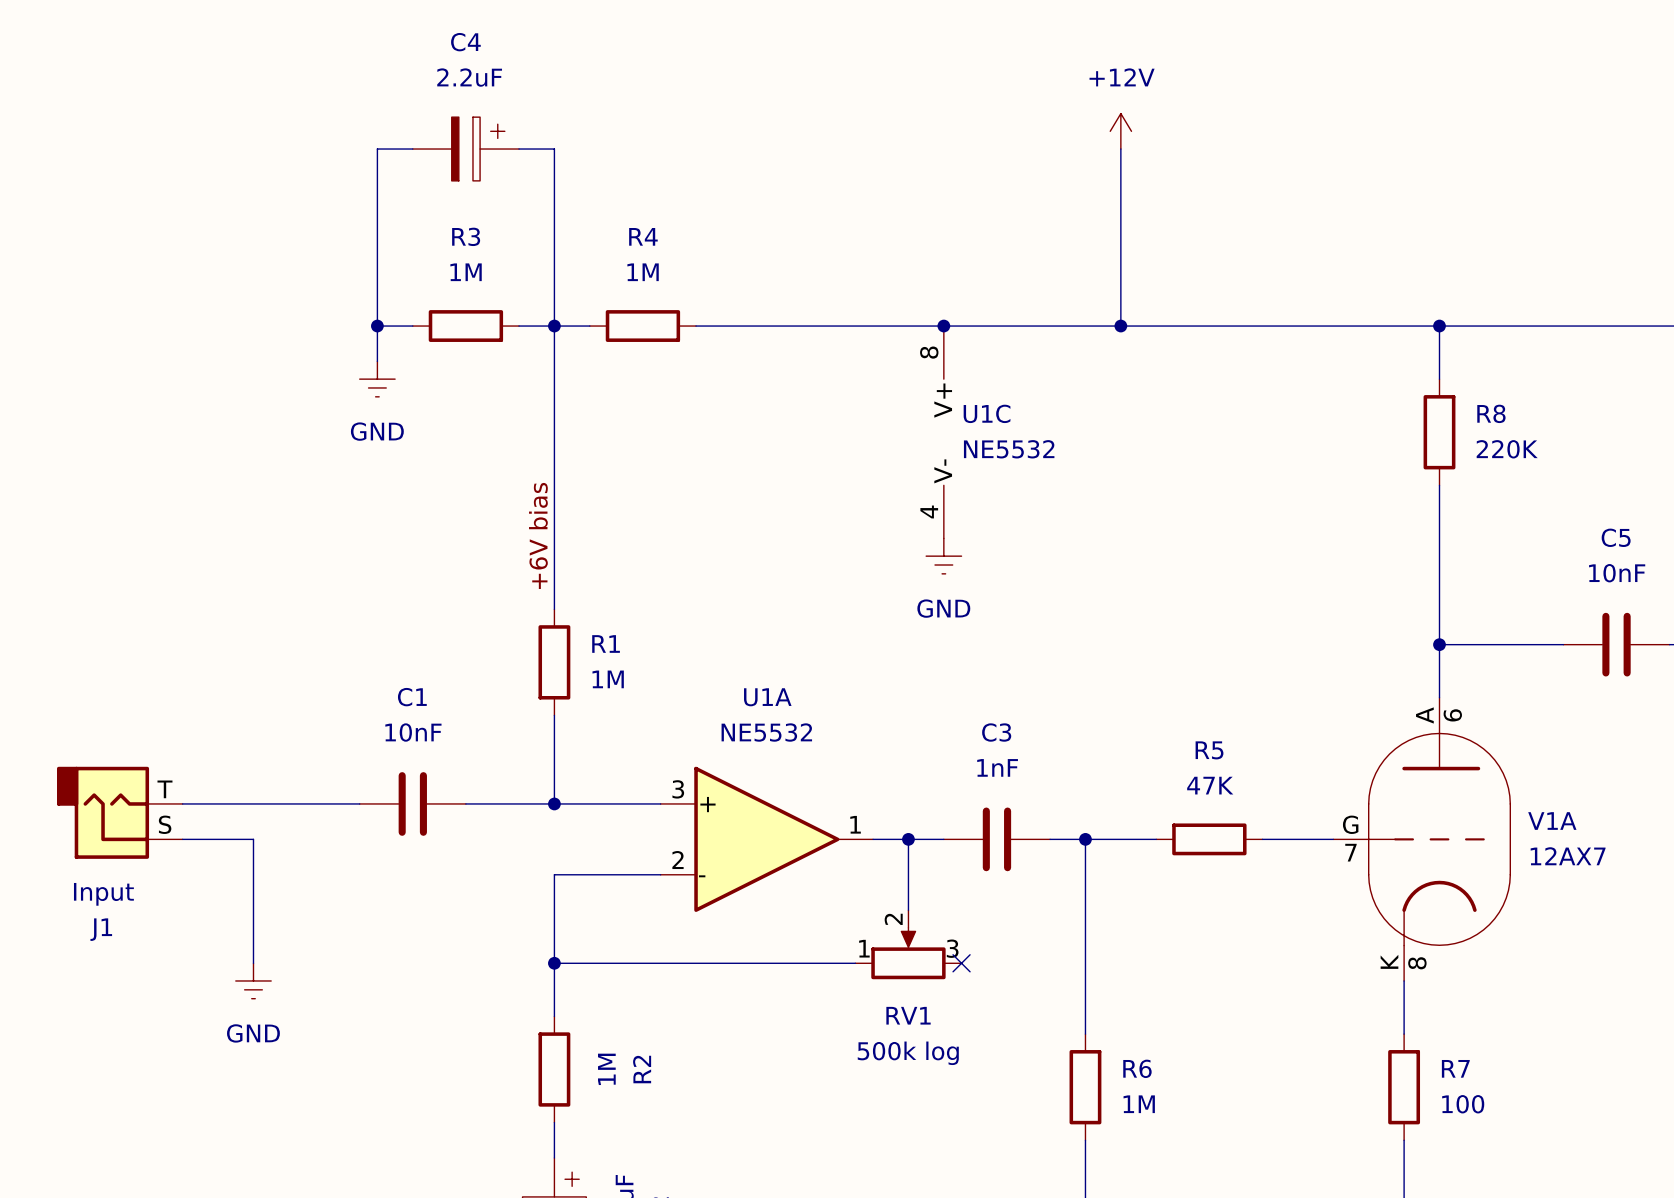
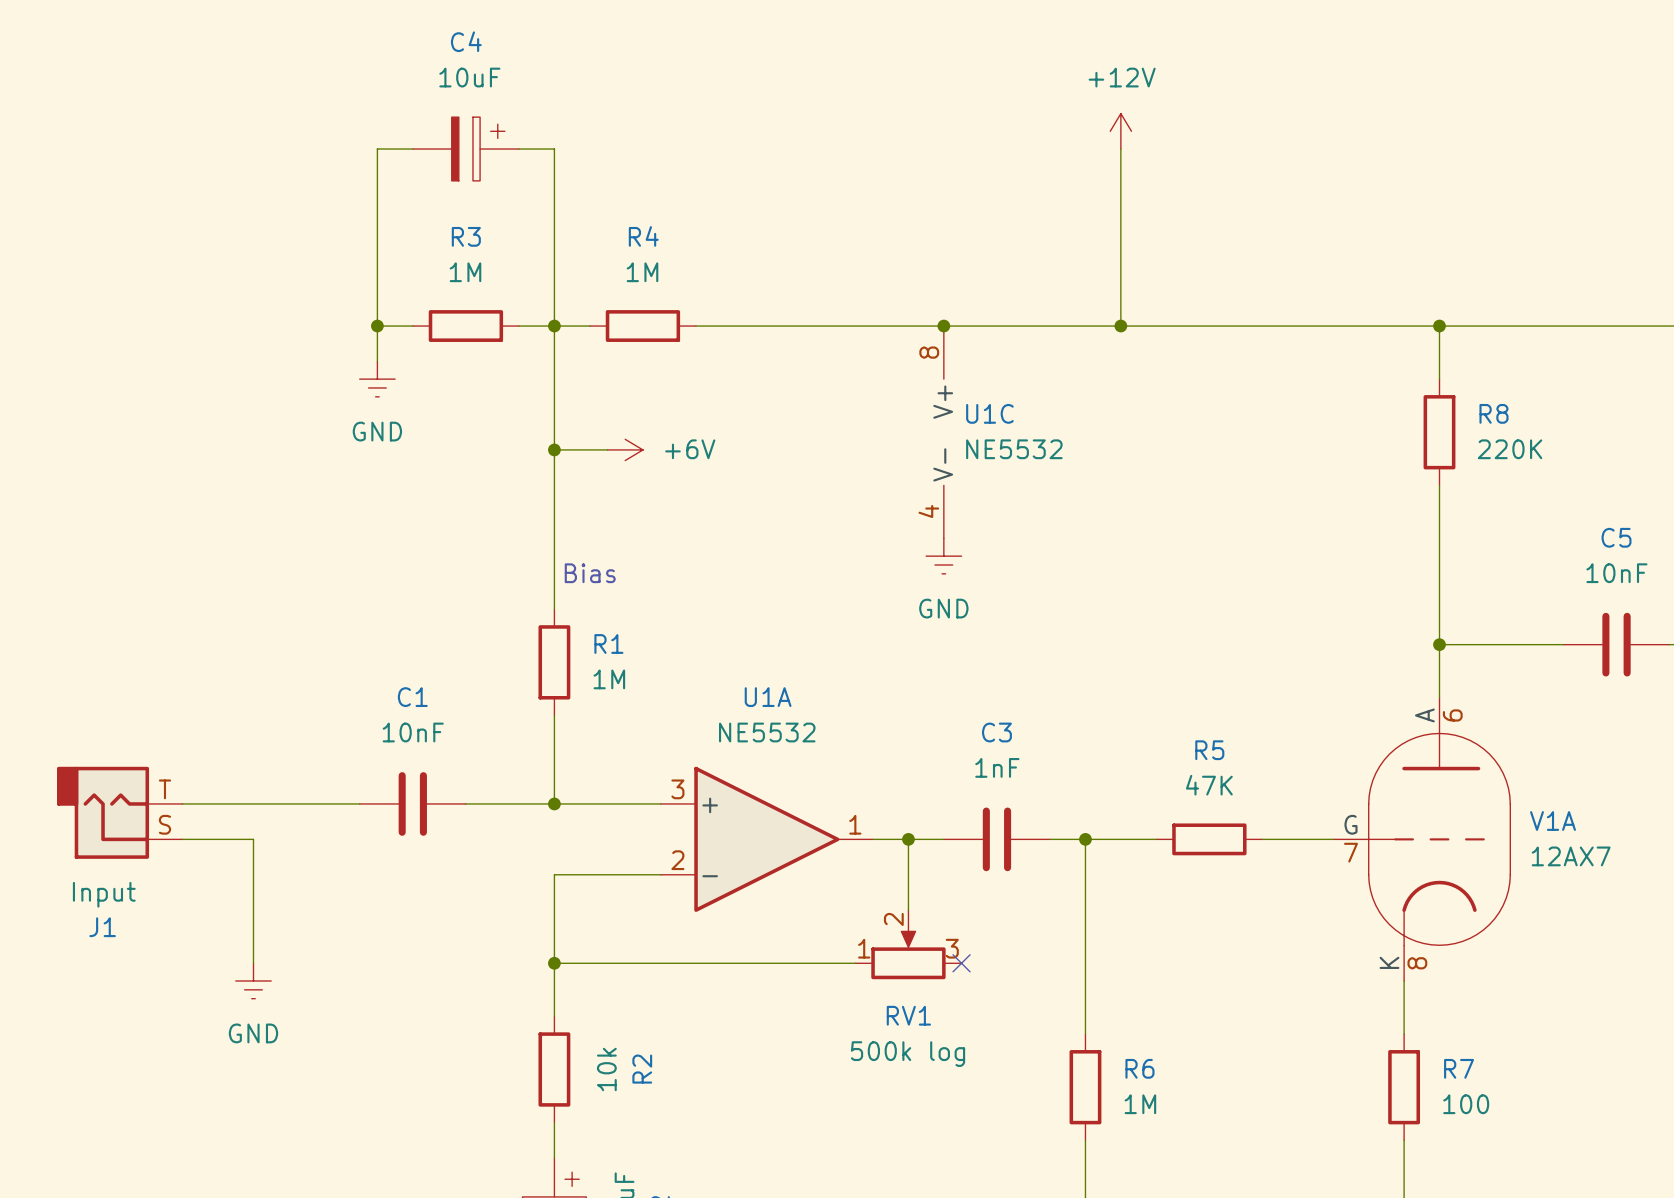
C4 value: 2.2uF (469, 77) -> 10uF (469, 77)
wire: none -> (554, 449) (607, 449)
junction: none -> (554, 449)
power symbol: none -> +6V (625, 449)
label: +6V bias (538, 535) -> none
text: none -> Bias (590, 573)
R2 value: 1M (606, 1069) -> 10k (606, 1069)

